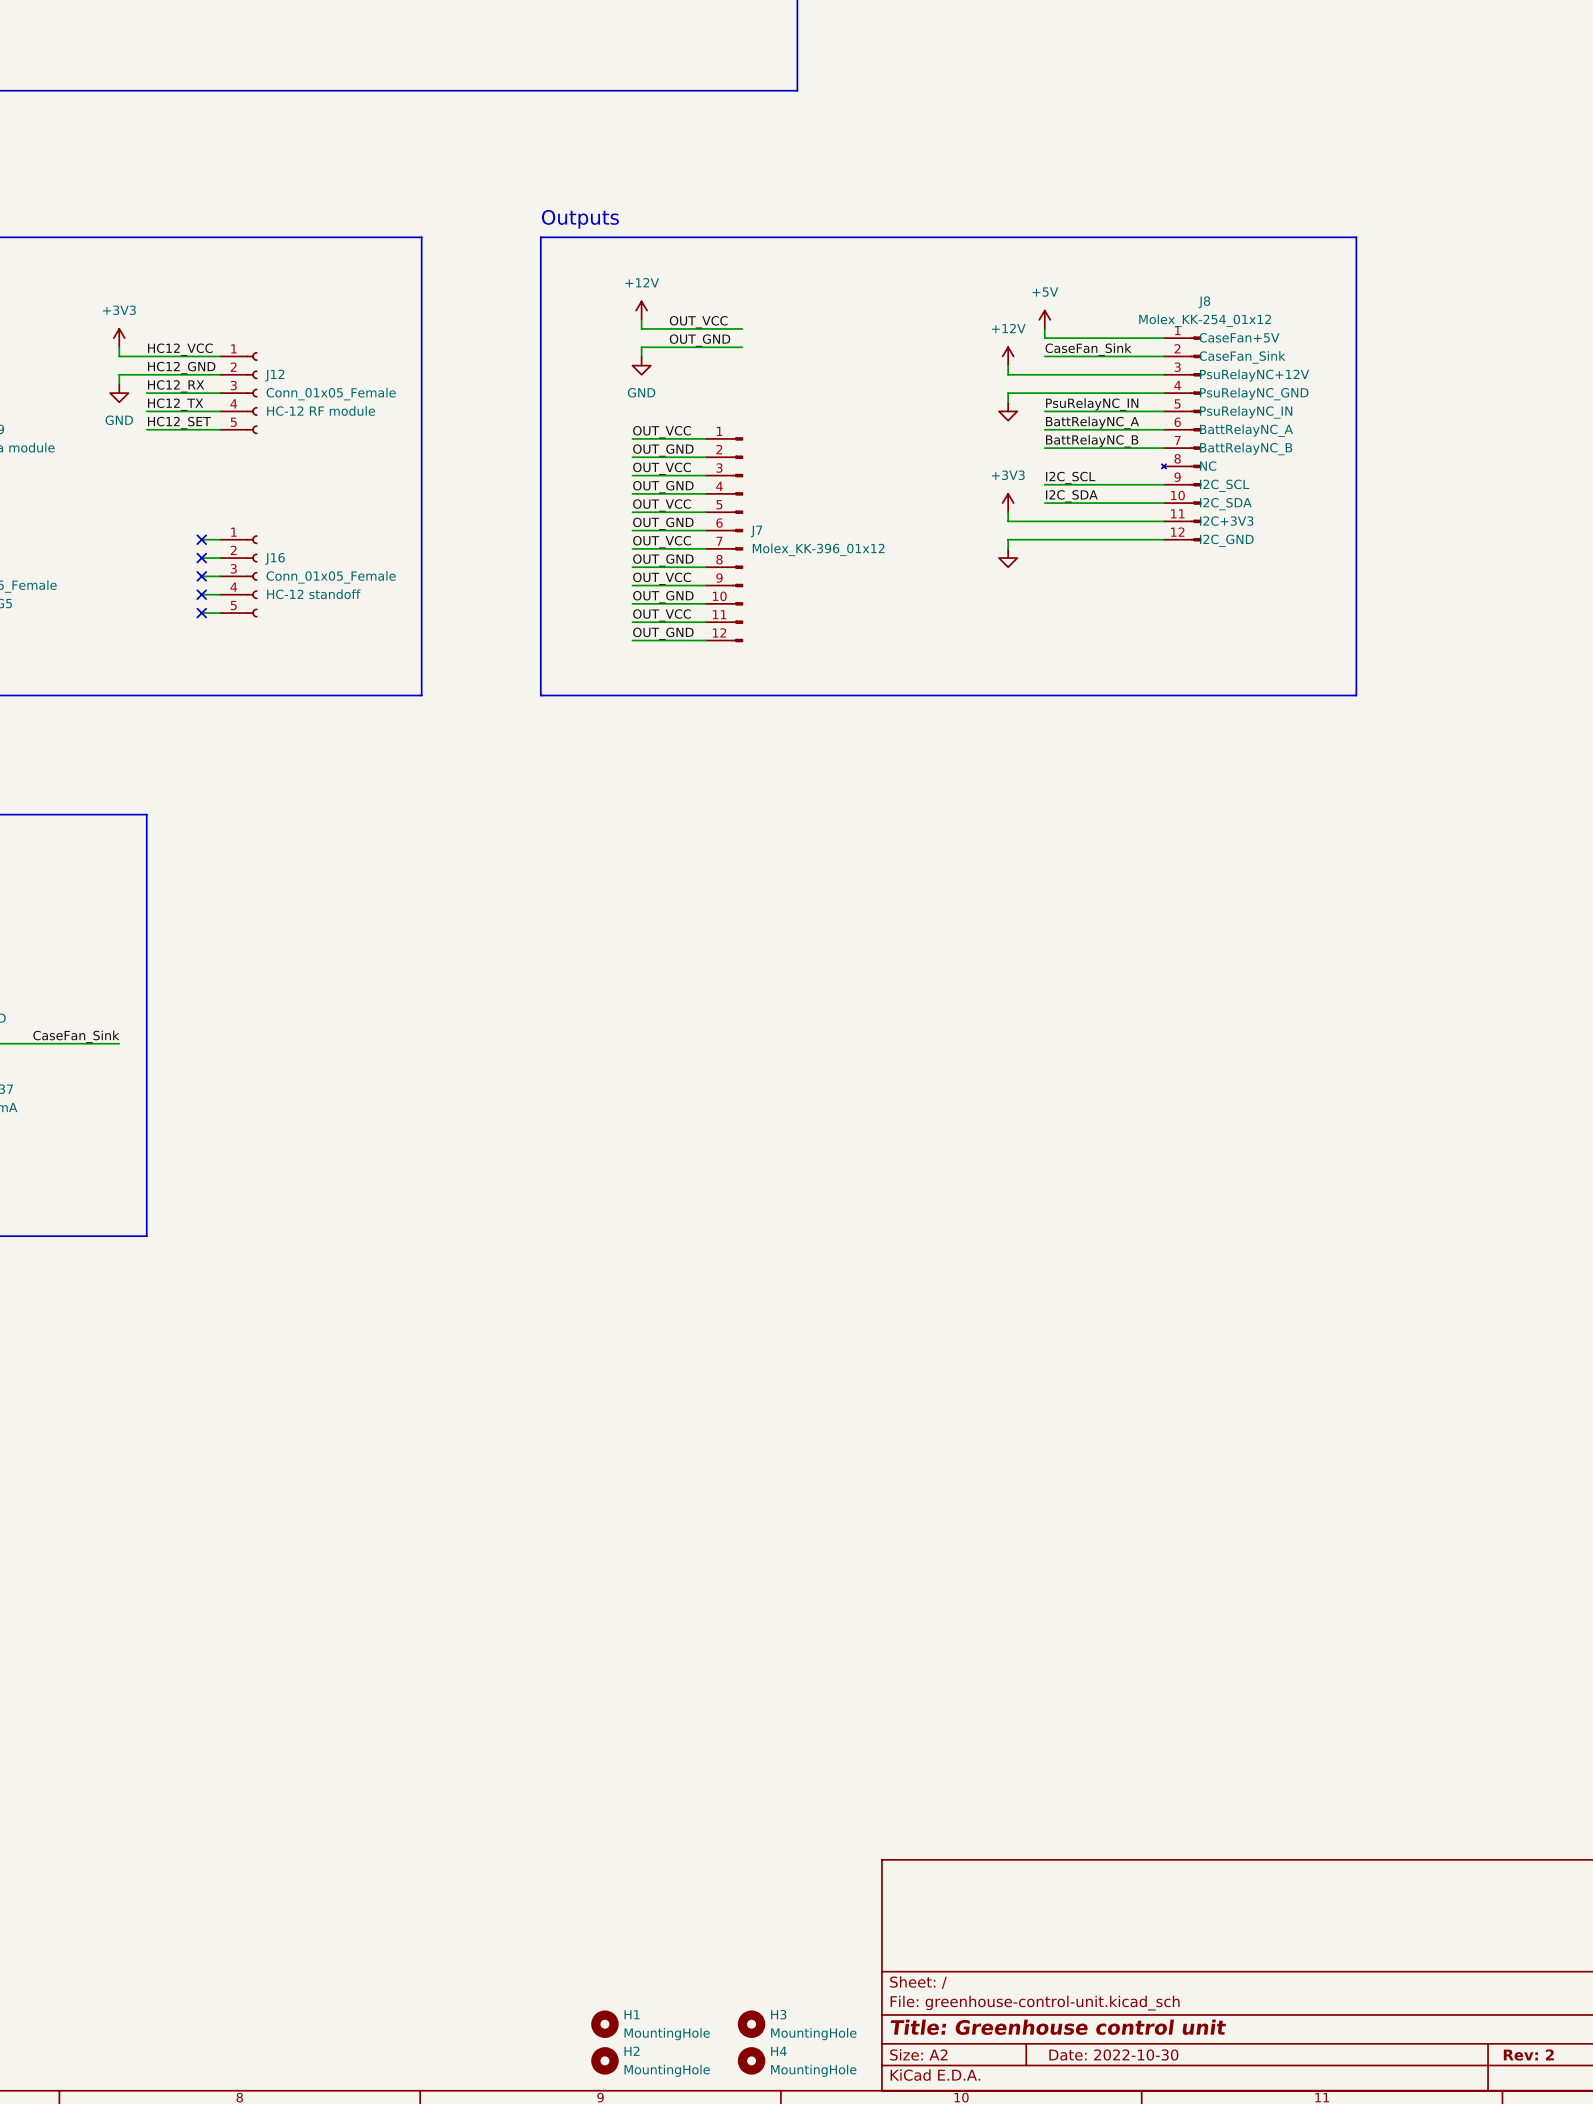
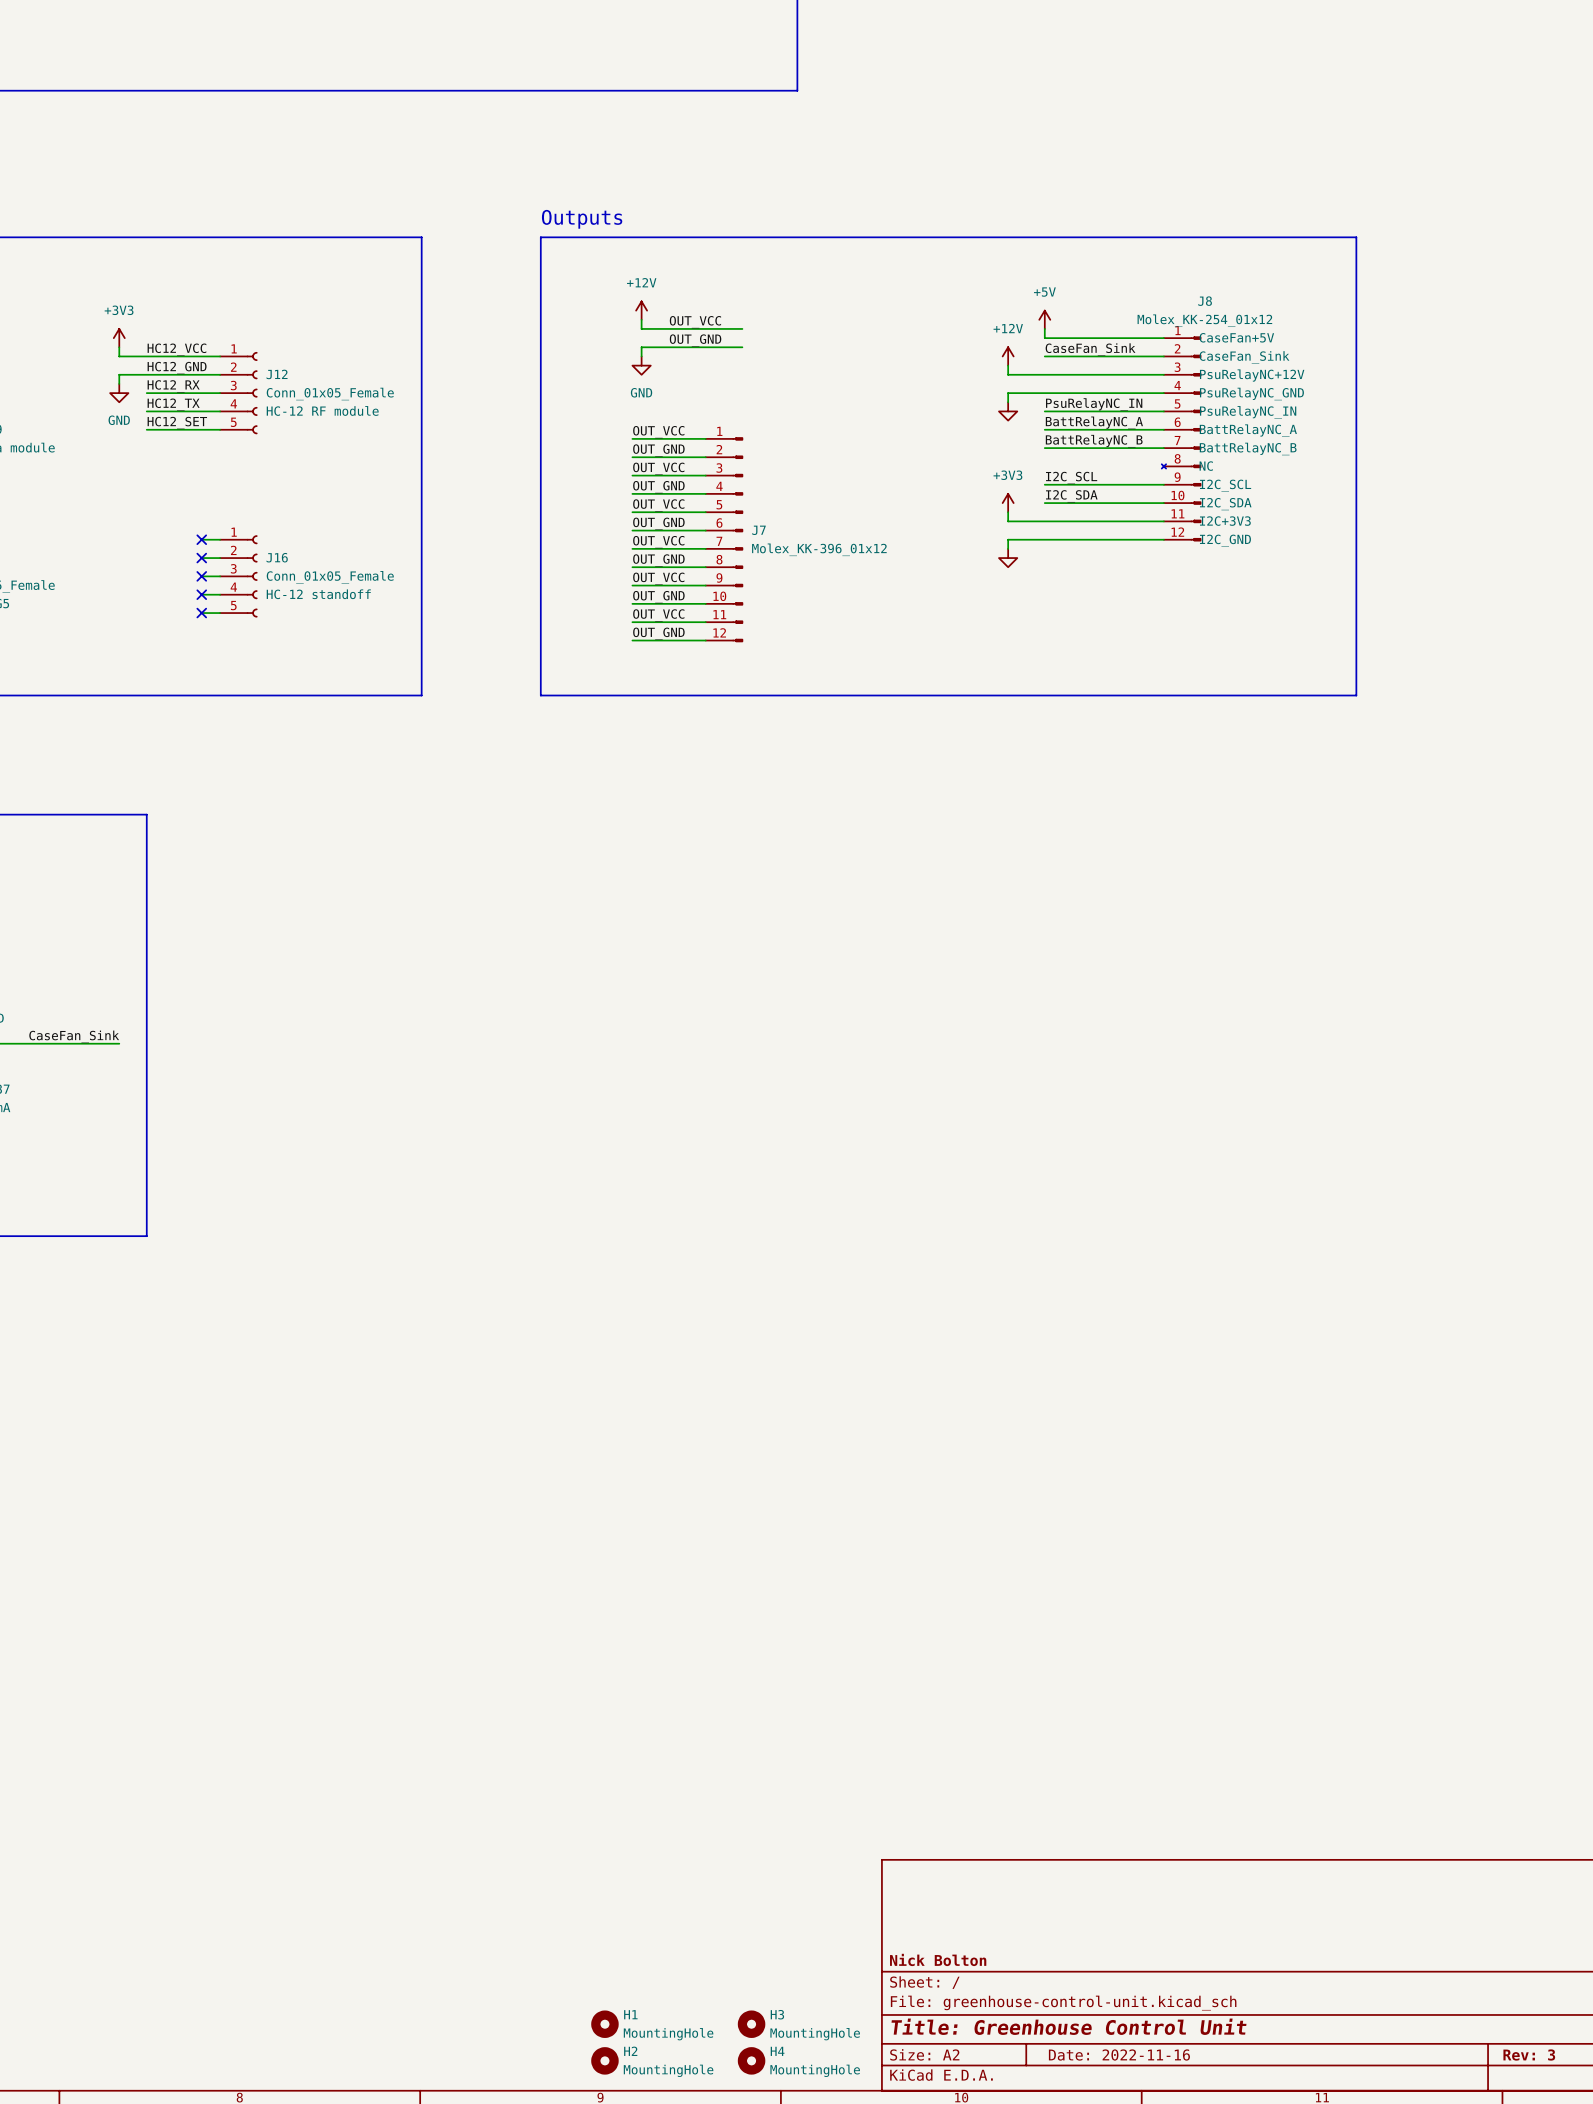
title block: none -> Nick Bolton (938, 1959)
title block: Title: Greenhouse control unit (1058, 2027) -> Title: Greenhouse Control Unit (1069, 2026)
title block: Date: 2022-10-30 (1113, 2054) -> Date: 2022-11-16 (1119, 2054)
title block: Rev: 2 (1528, 2054) -> Rev: 3 (1529, 2054)

